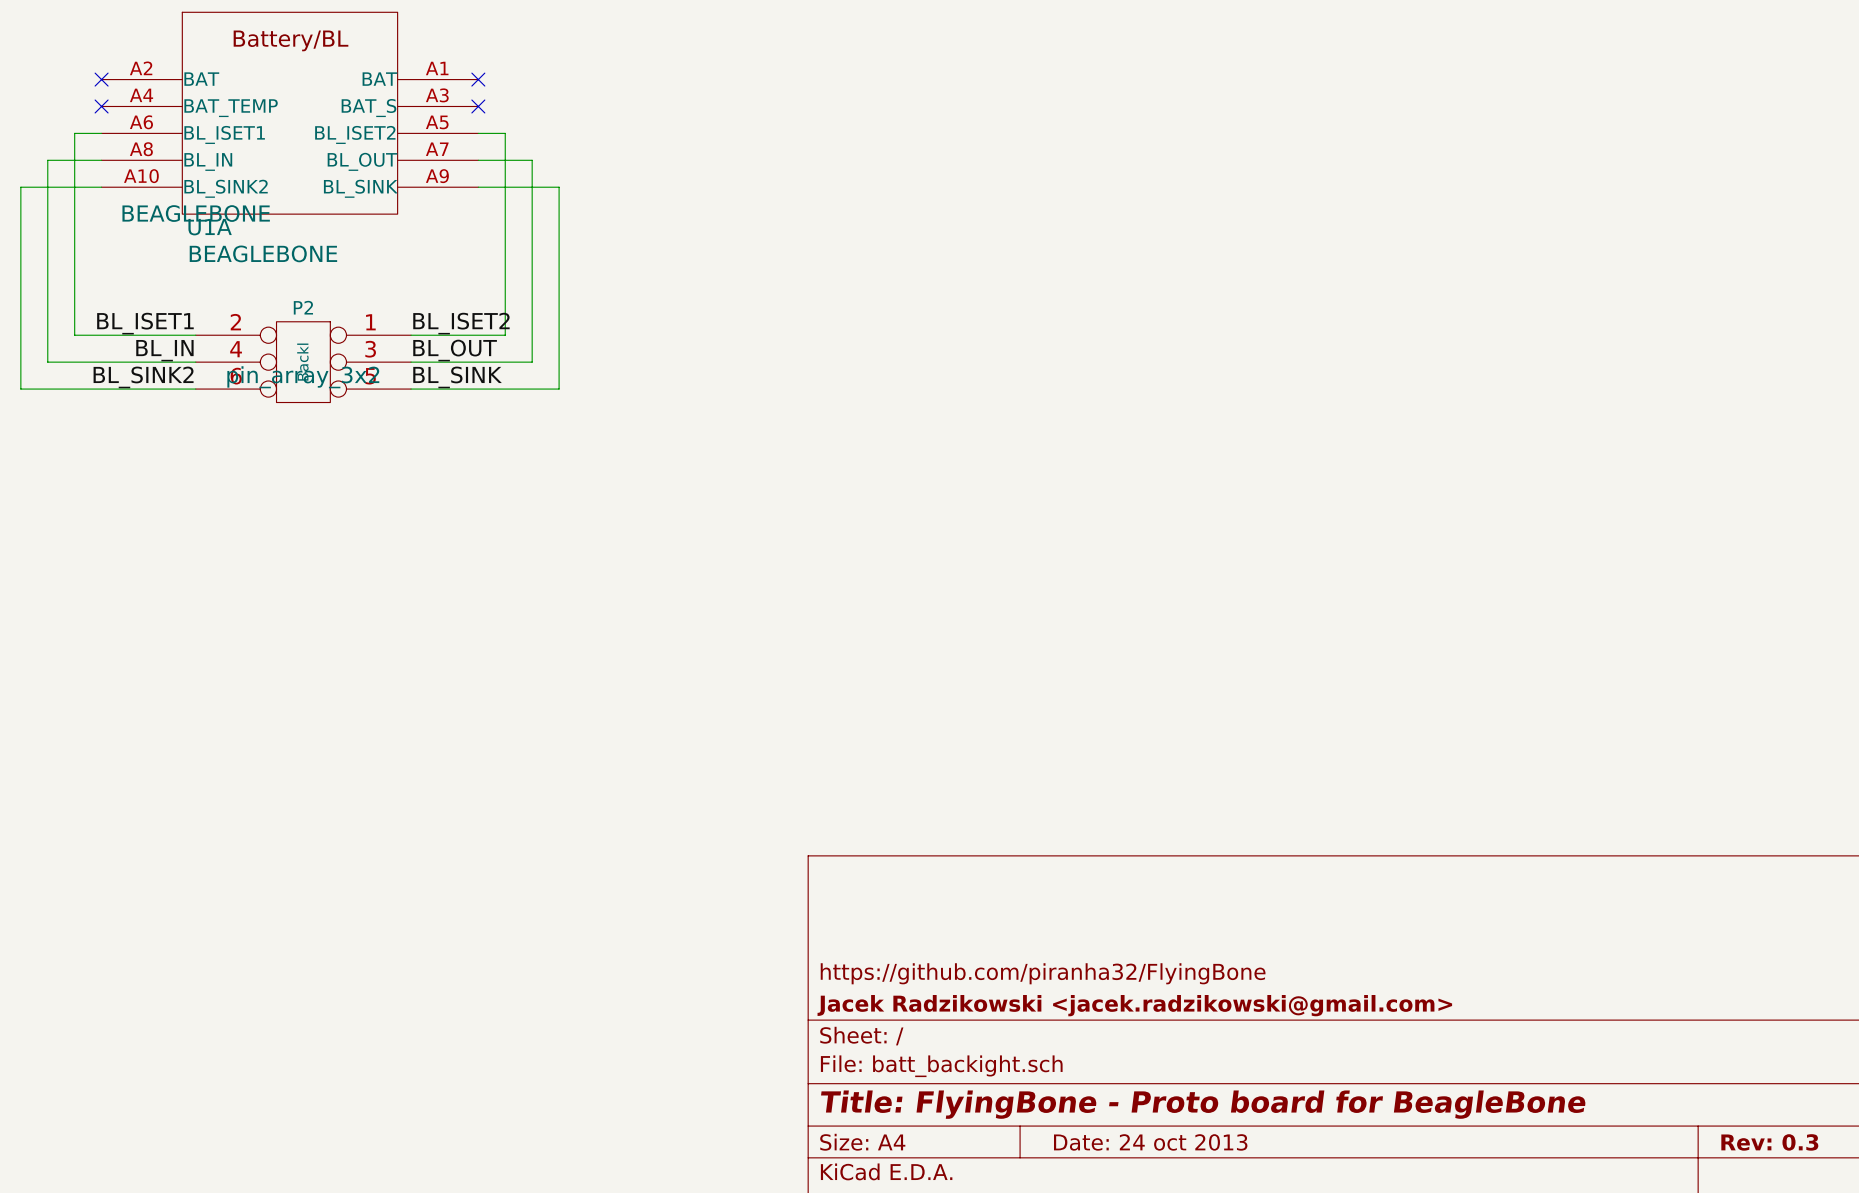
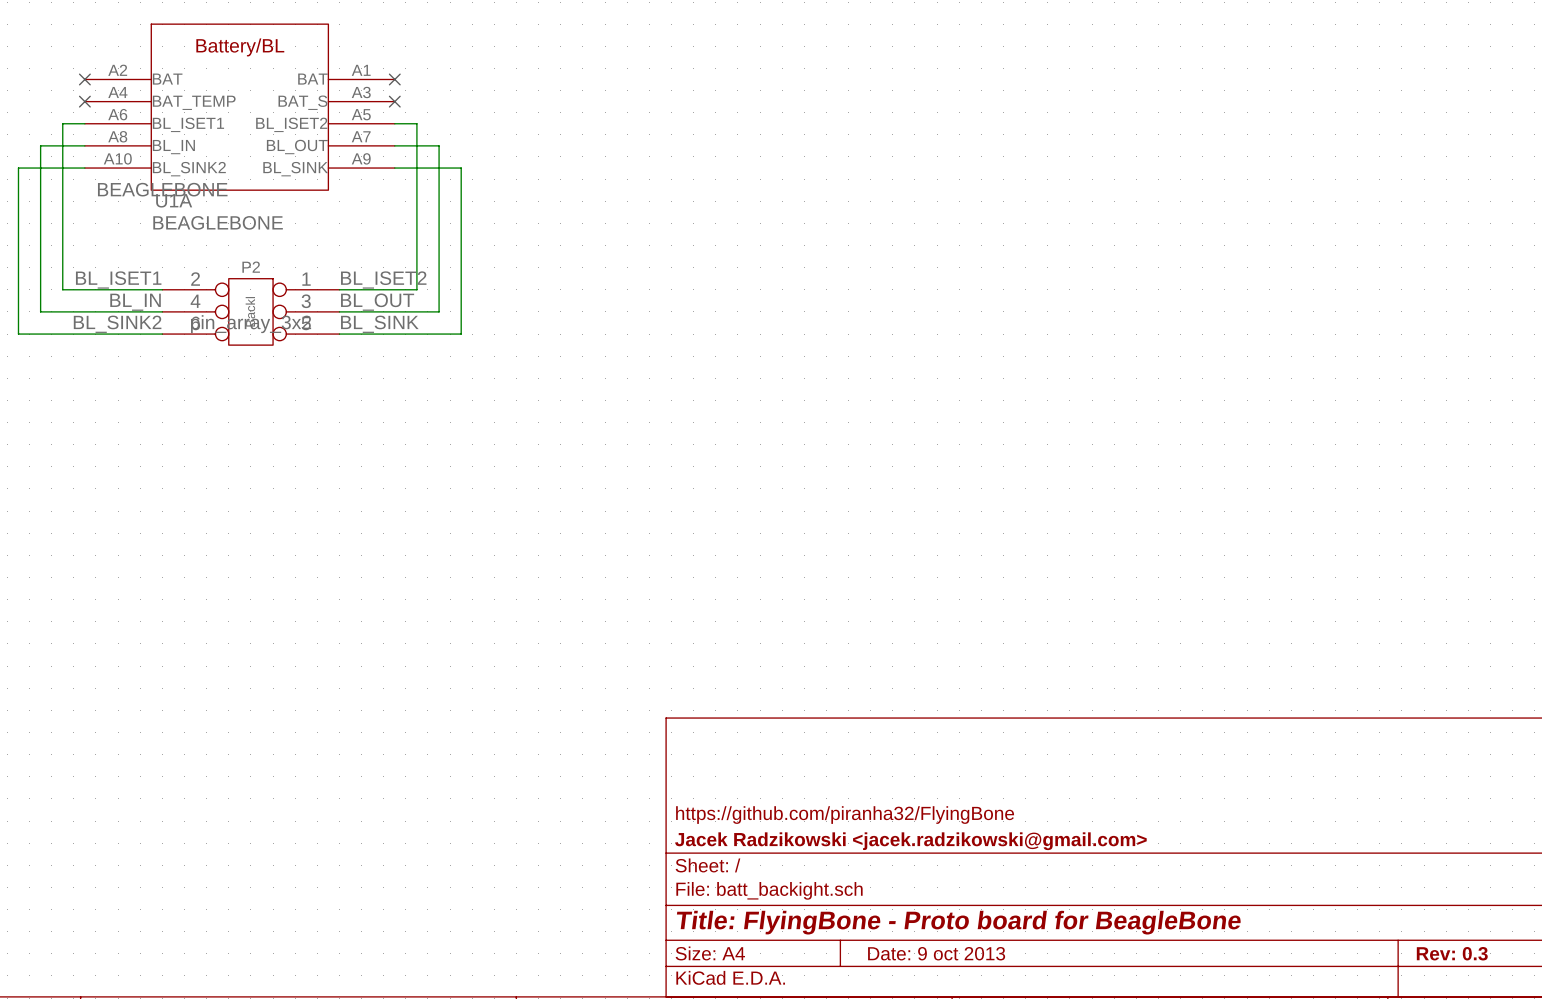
title block: Date: 24 oct 2013 (1150, 1142) -> Date: 9 oct 2013 (936, 953)

